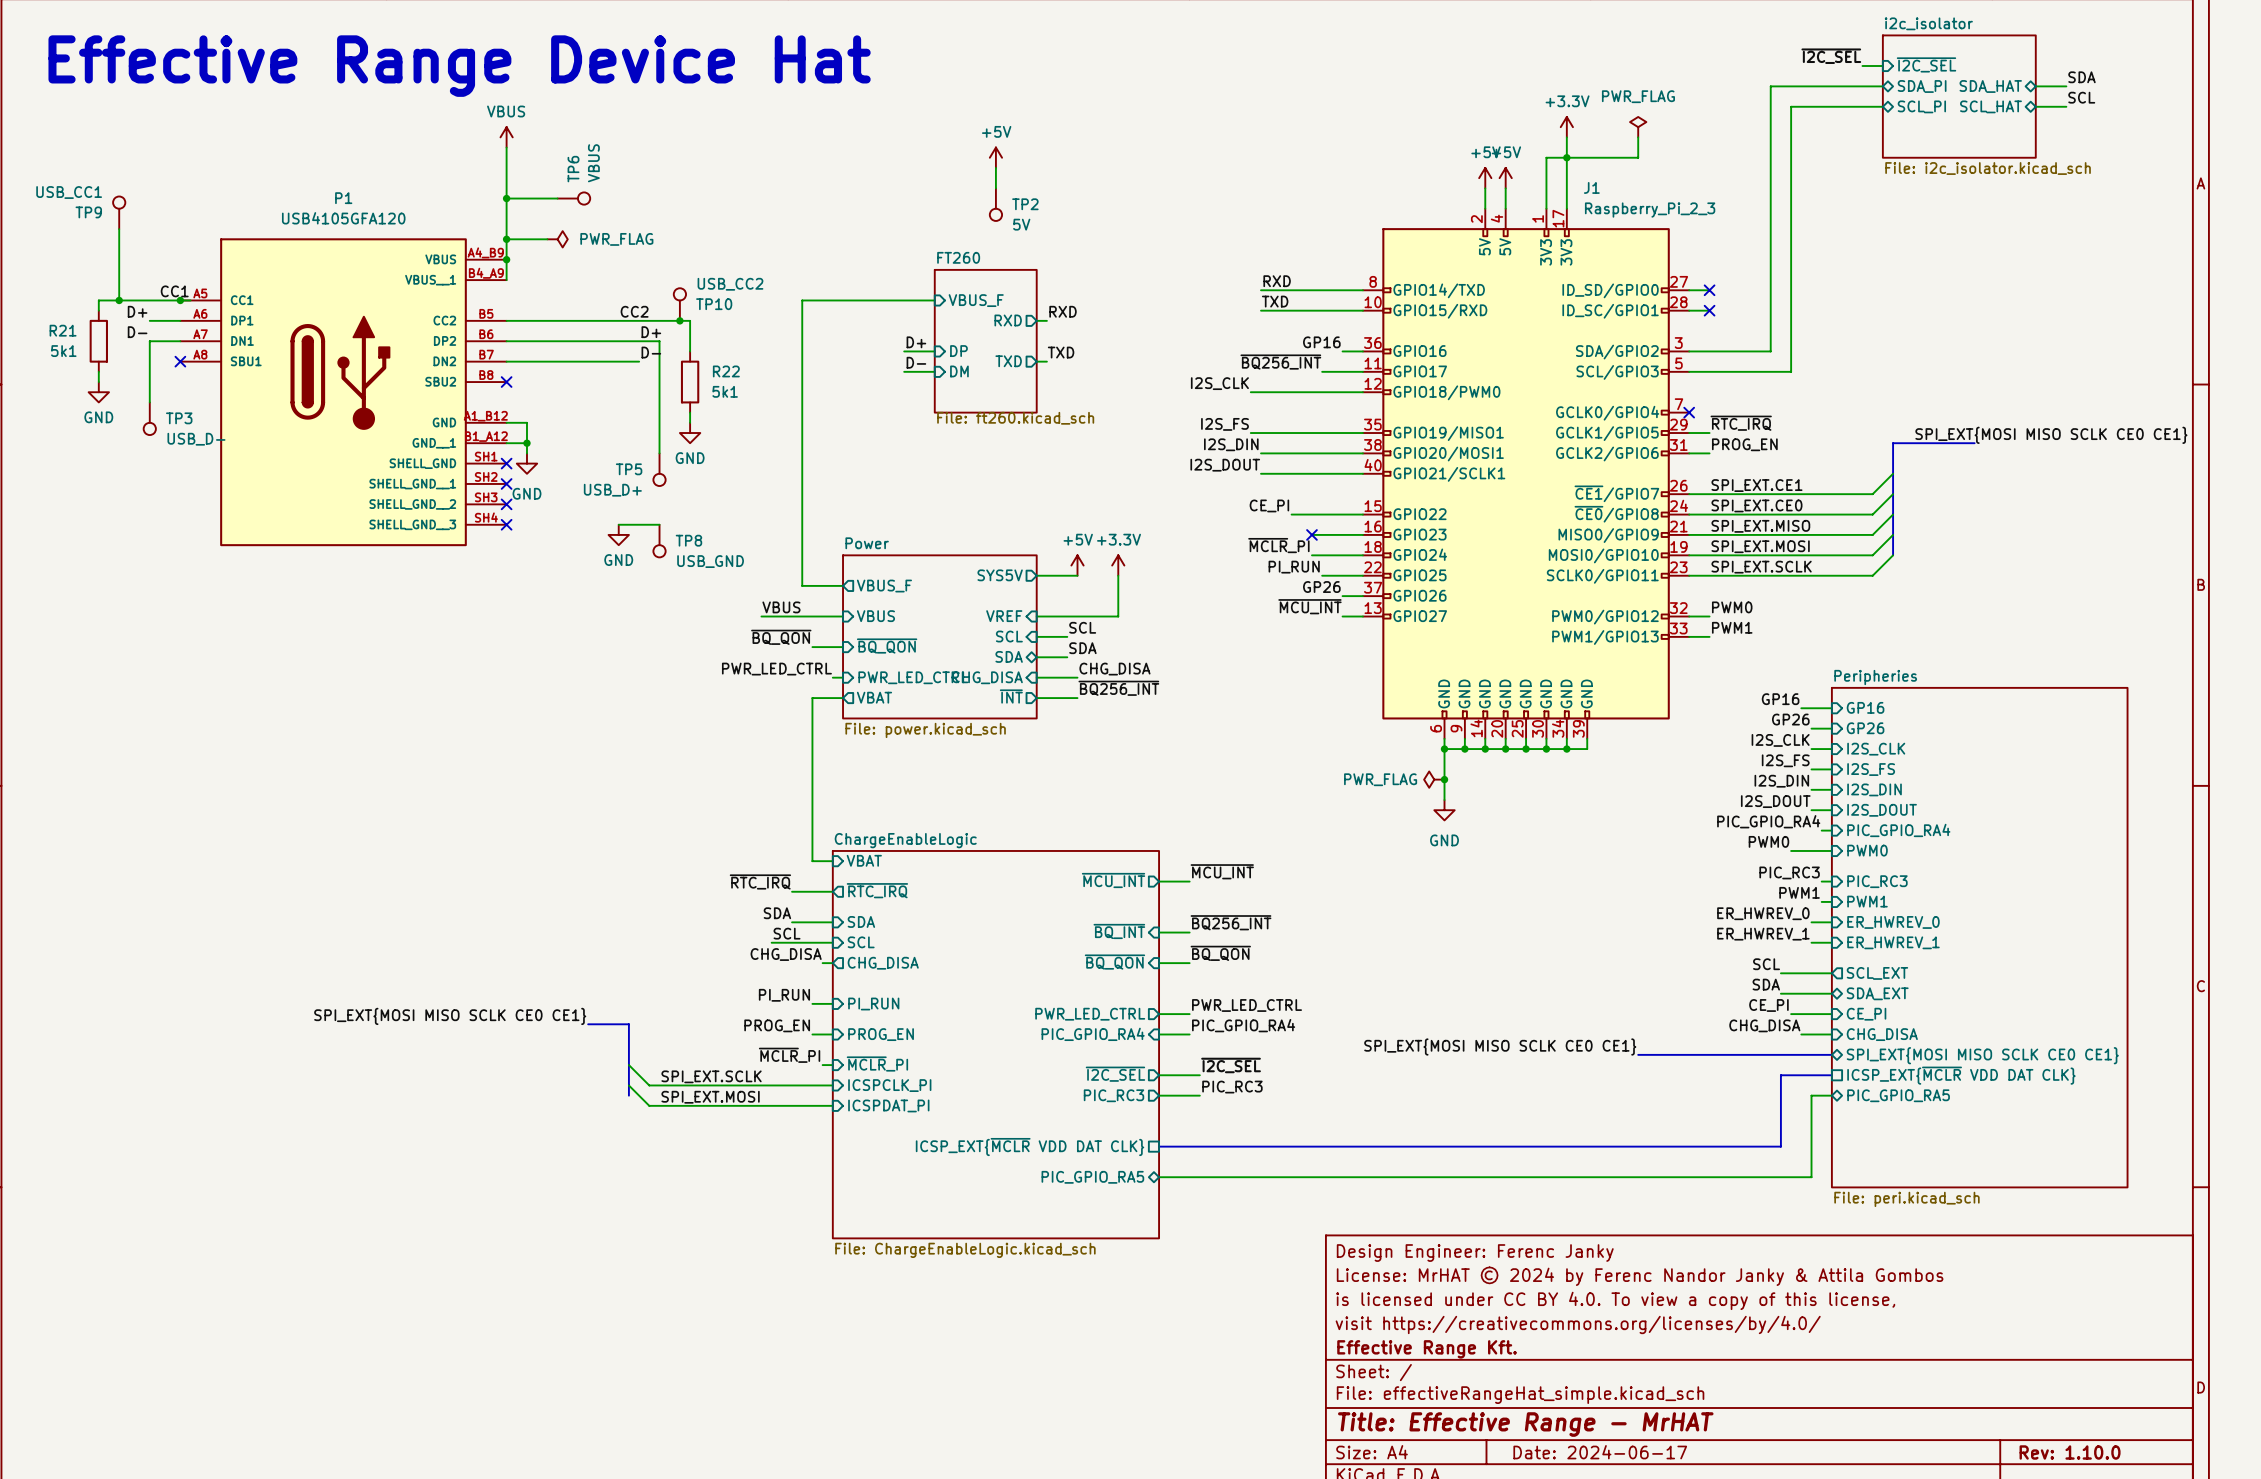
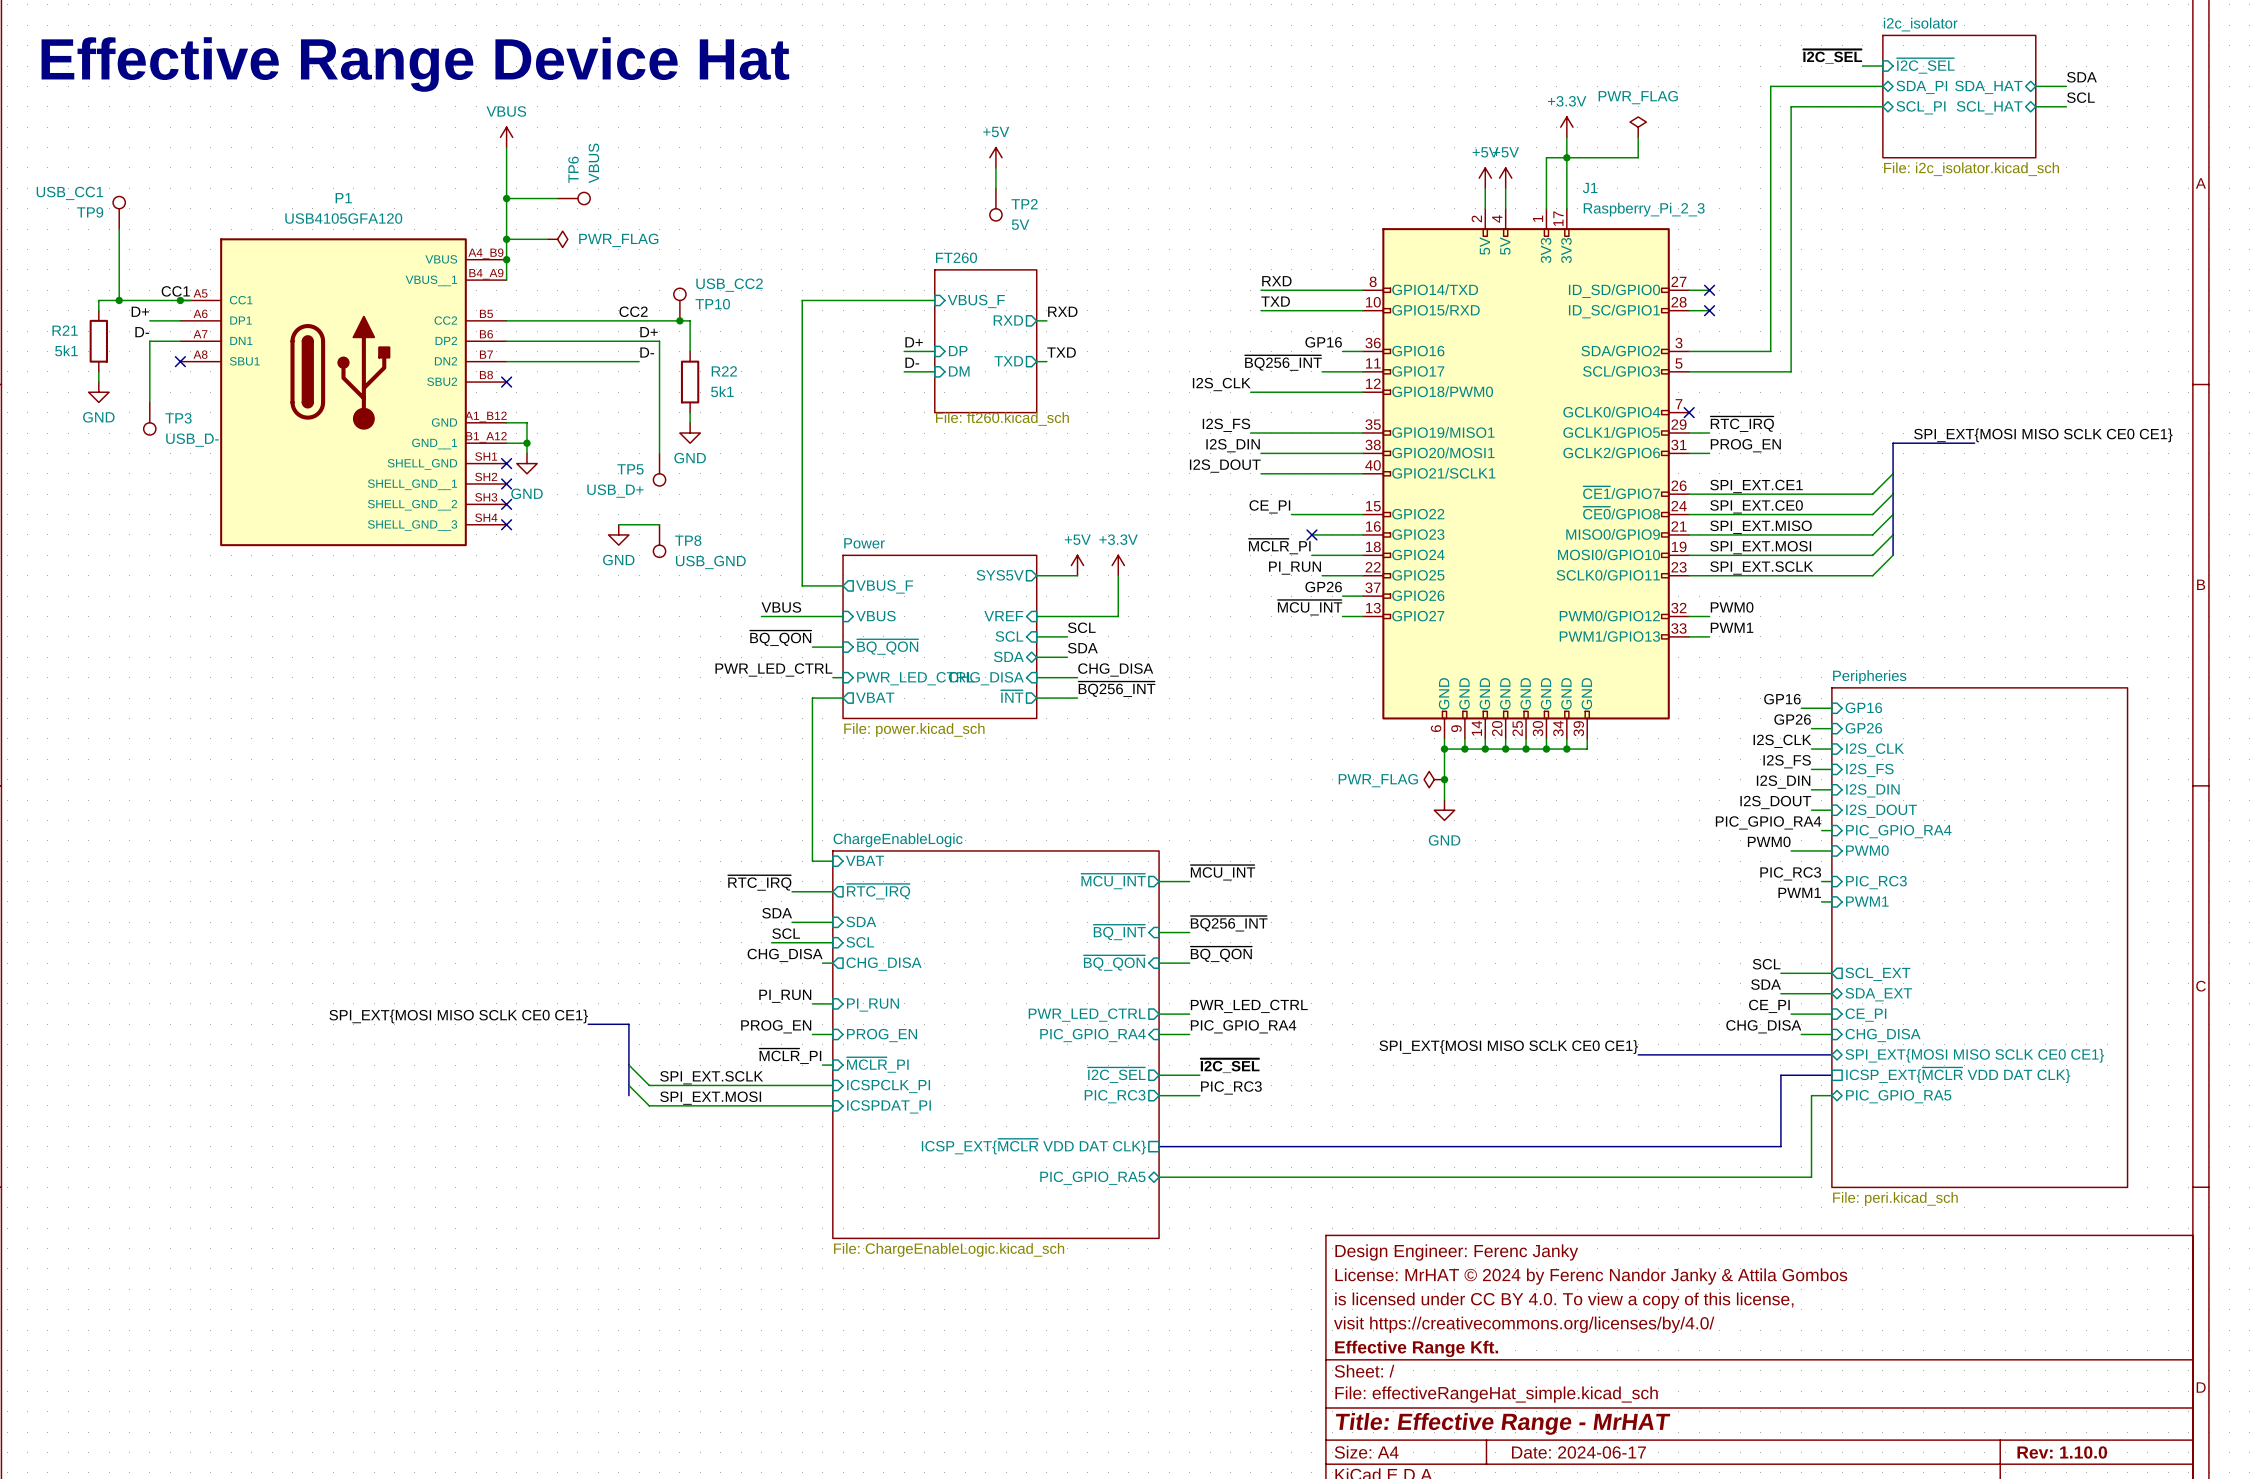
label: ER_HWREV_0 (1763, 913) -> none
wire: (1811, 922) (1831, 922) -> none
sheet pin: ER_HWREV_0 (1893, 922) -> none
label: ER_HWREV_1 (1763, 934) -> none
wire: (1811, 942) (1831, 942) -> none
sheet pin: ER_HWREV_1 (1893, 942) -> none

